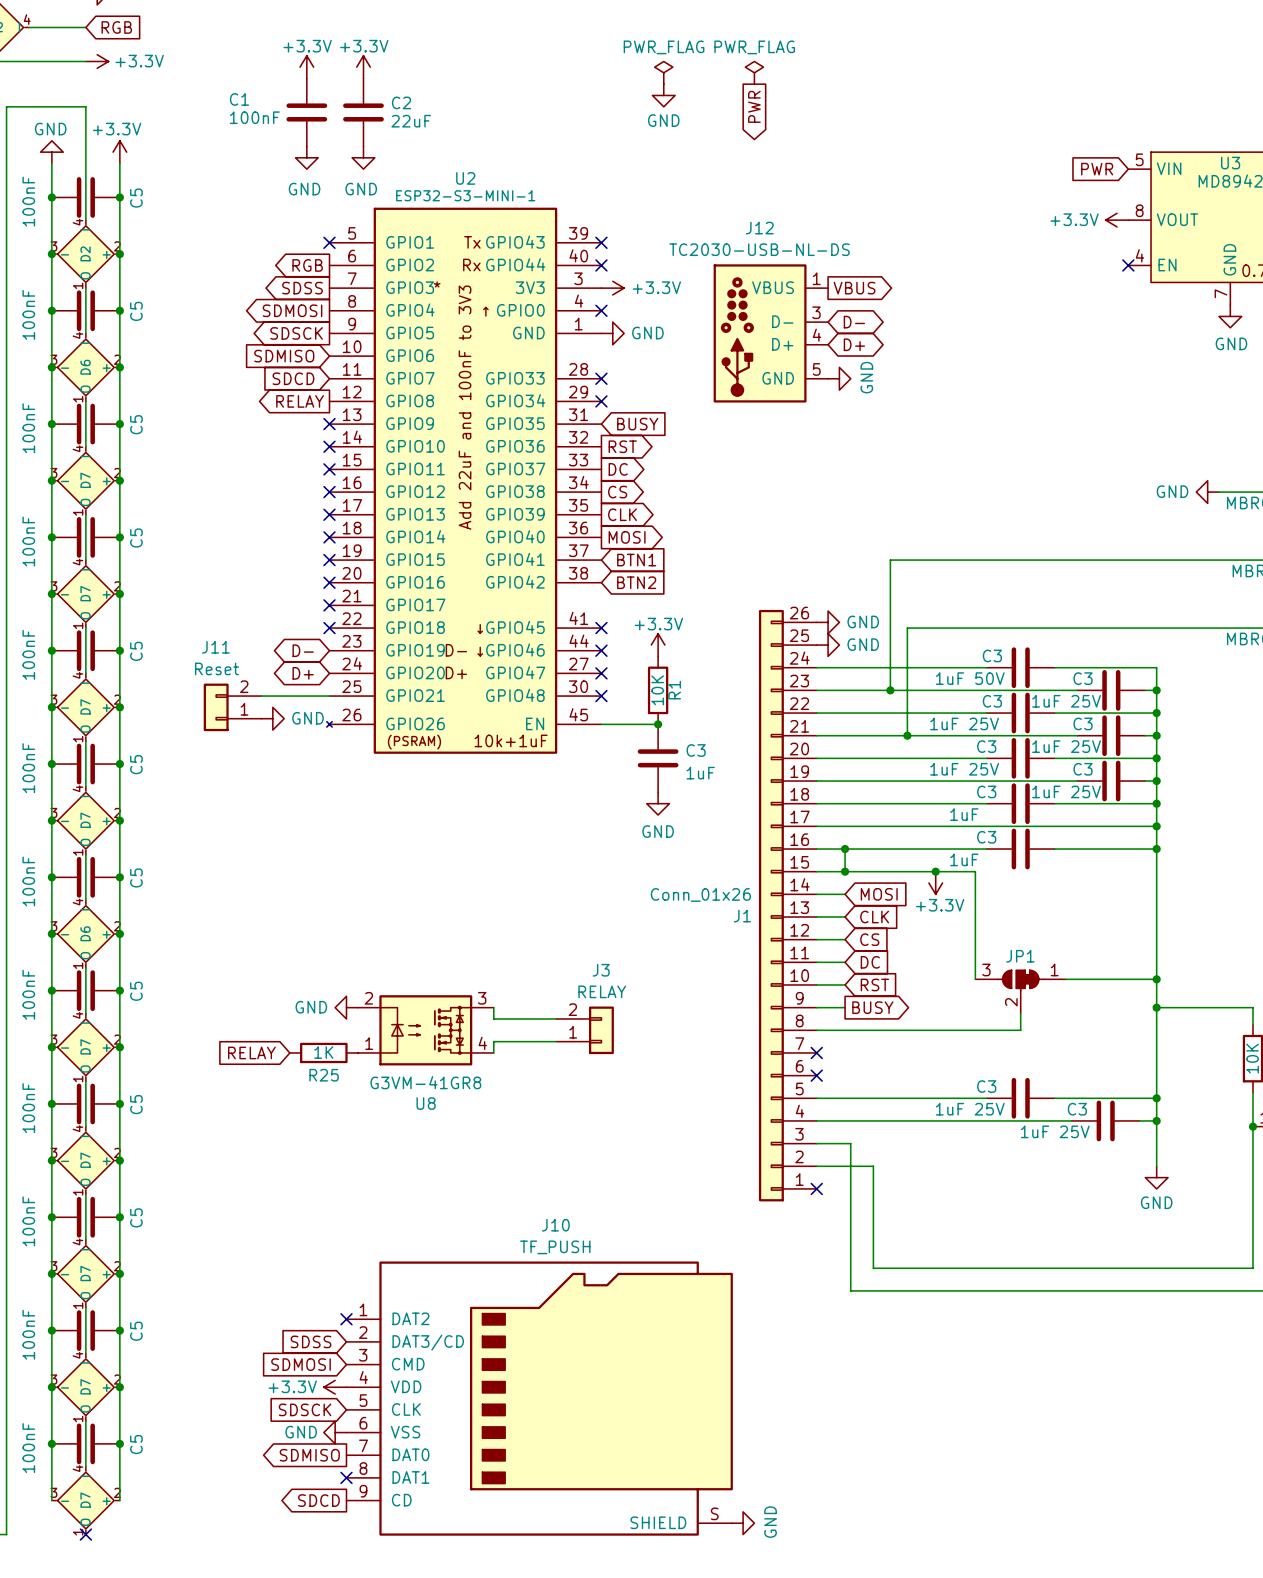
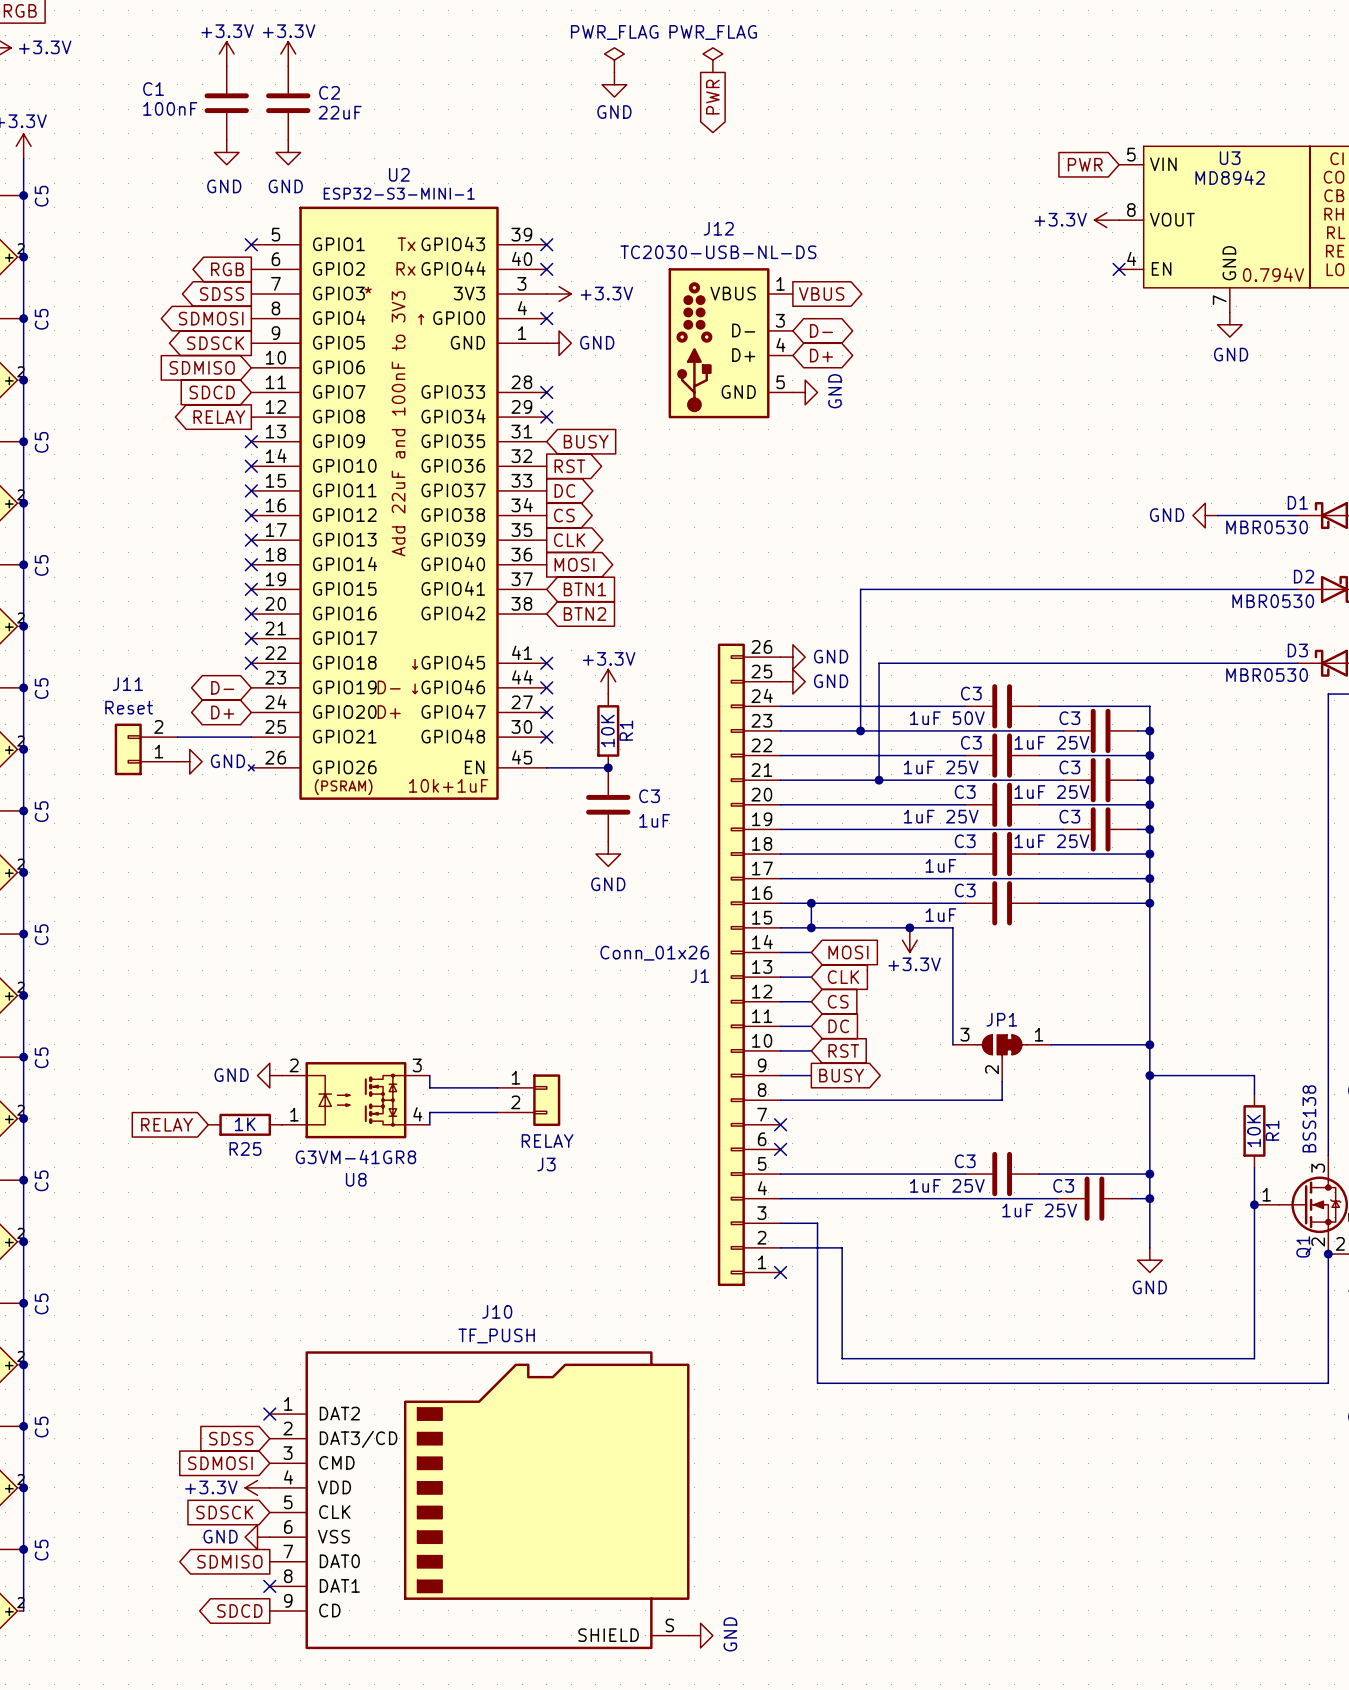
J3 flip: as is (601, 1030) -> up-down (546, 1100)

